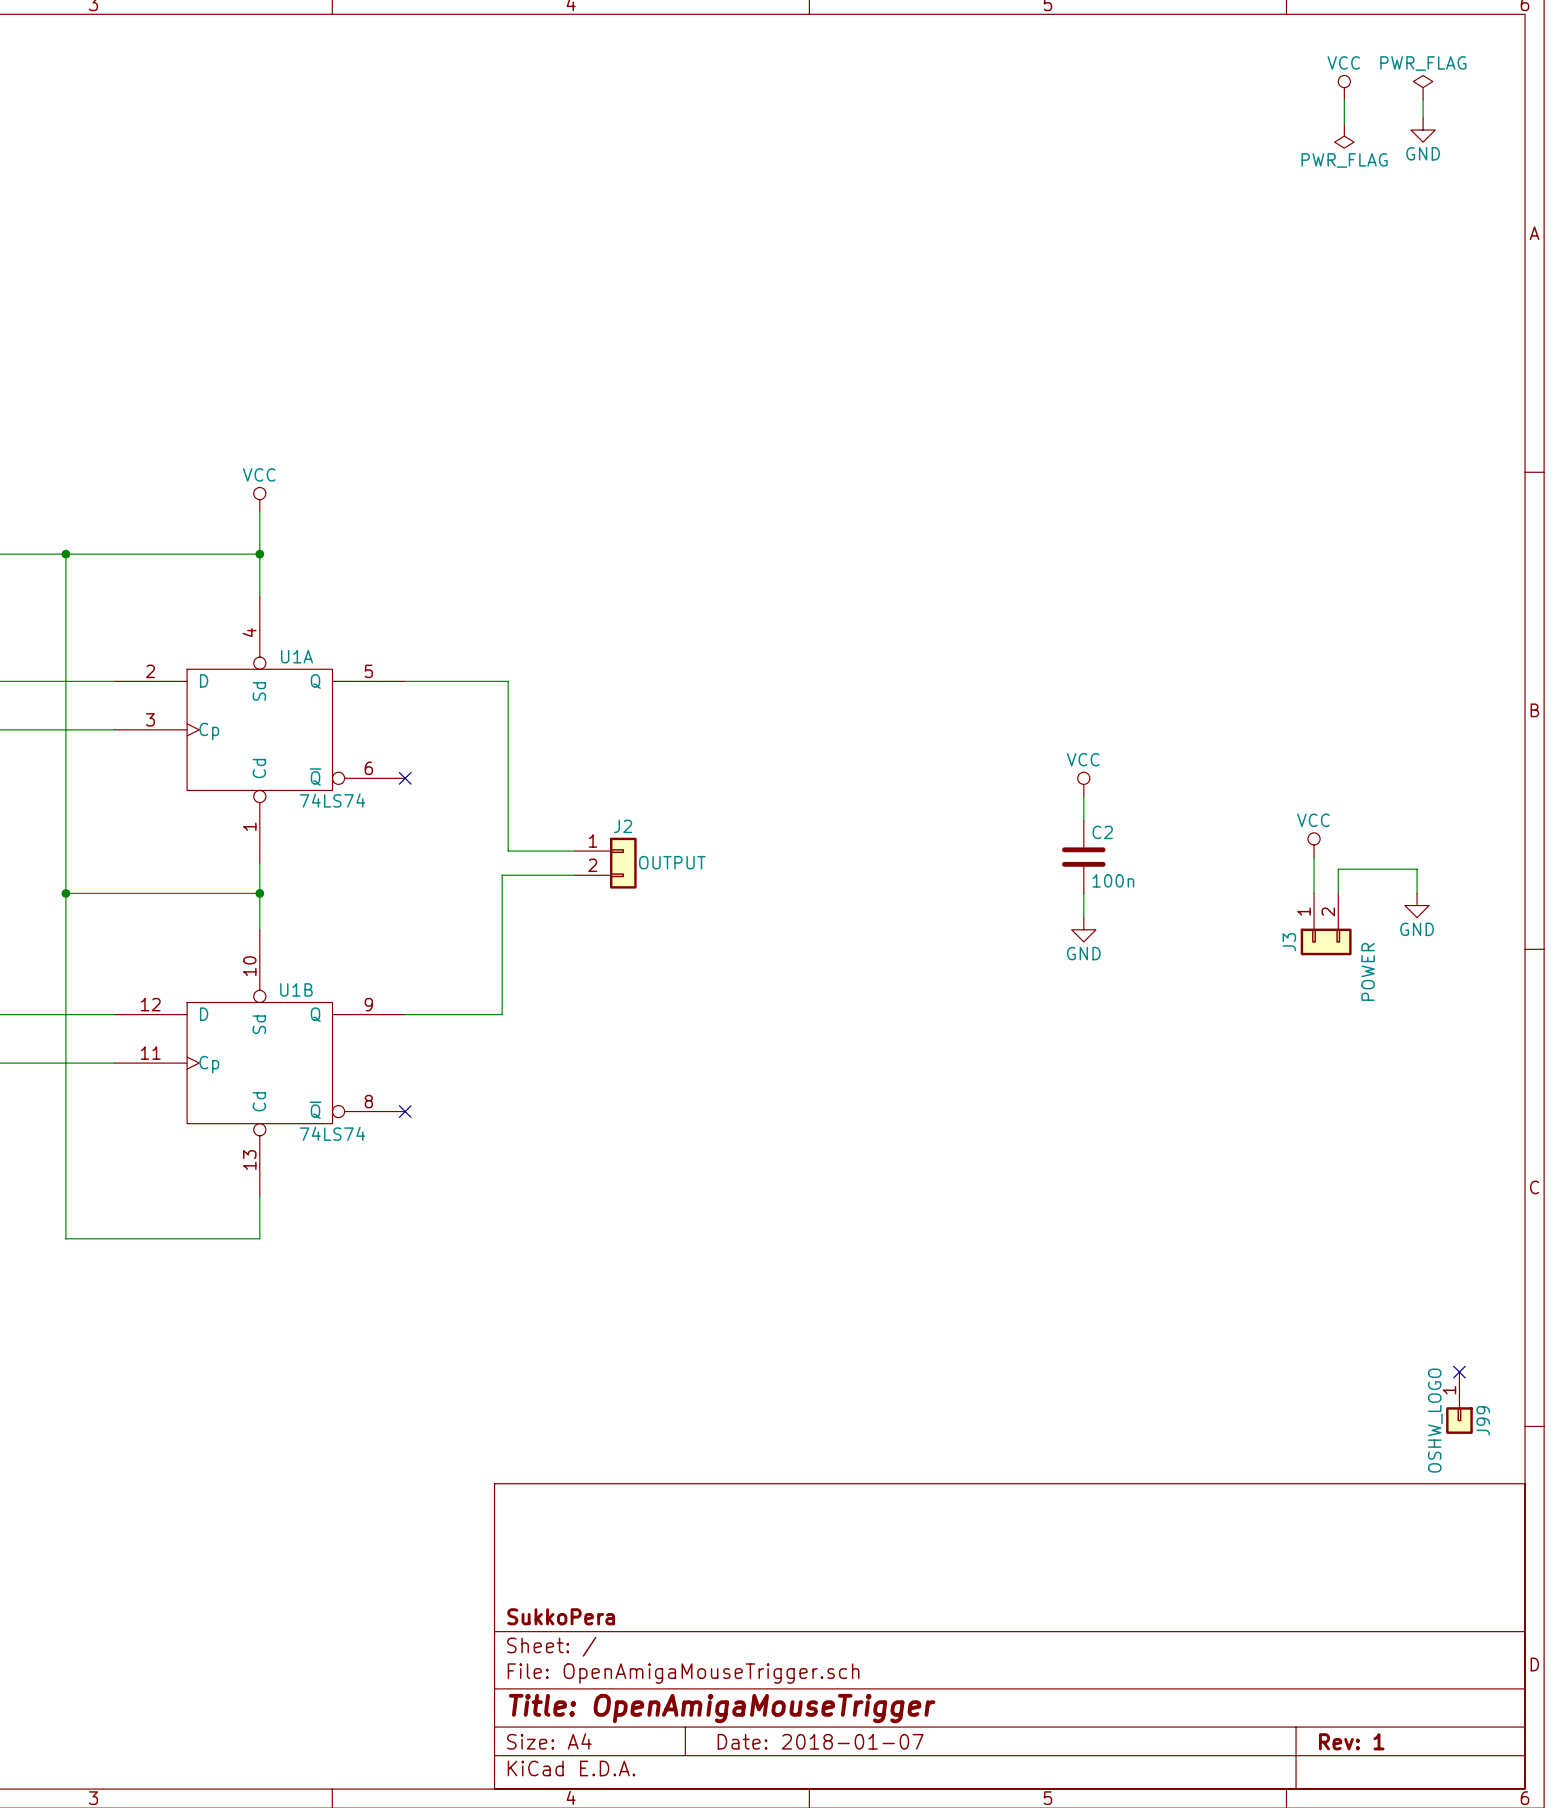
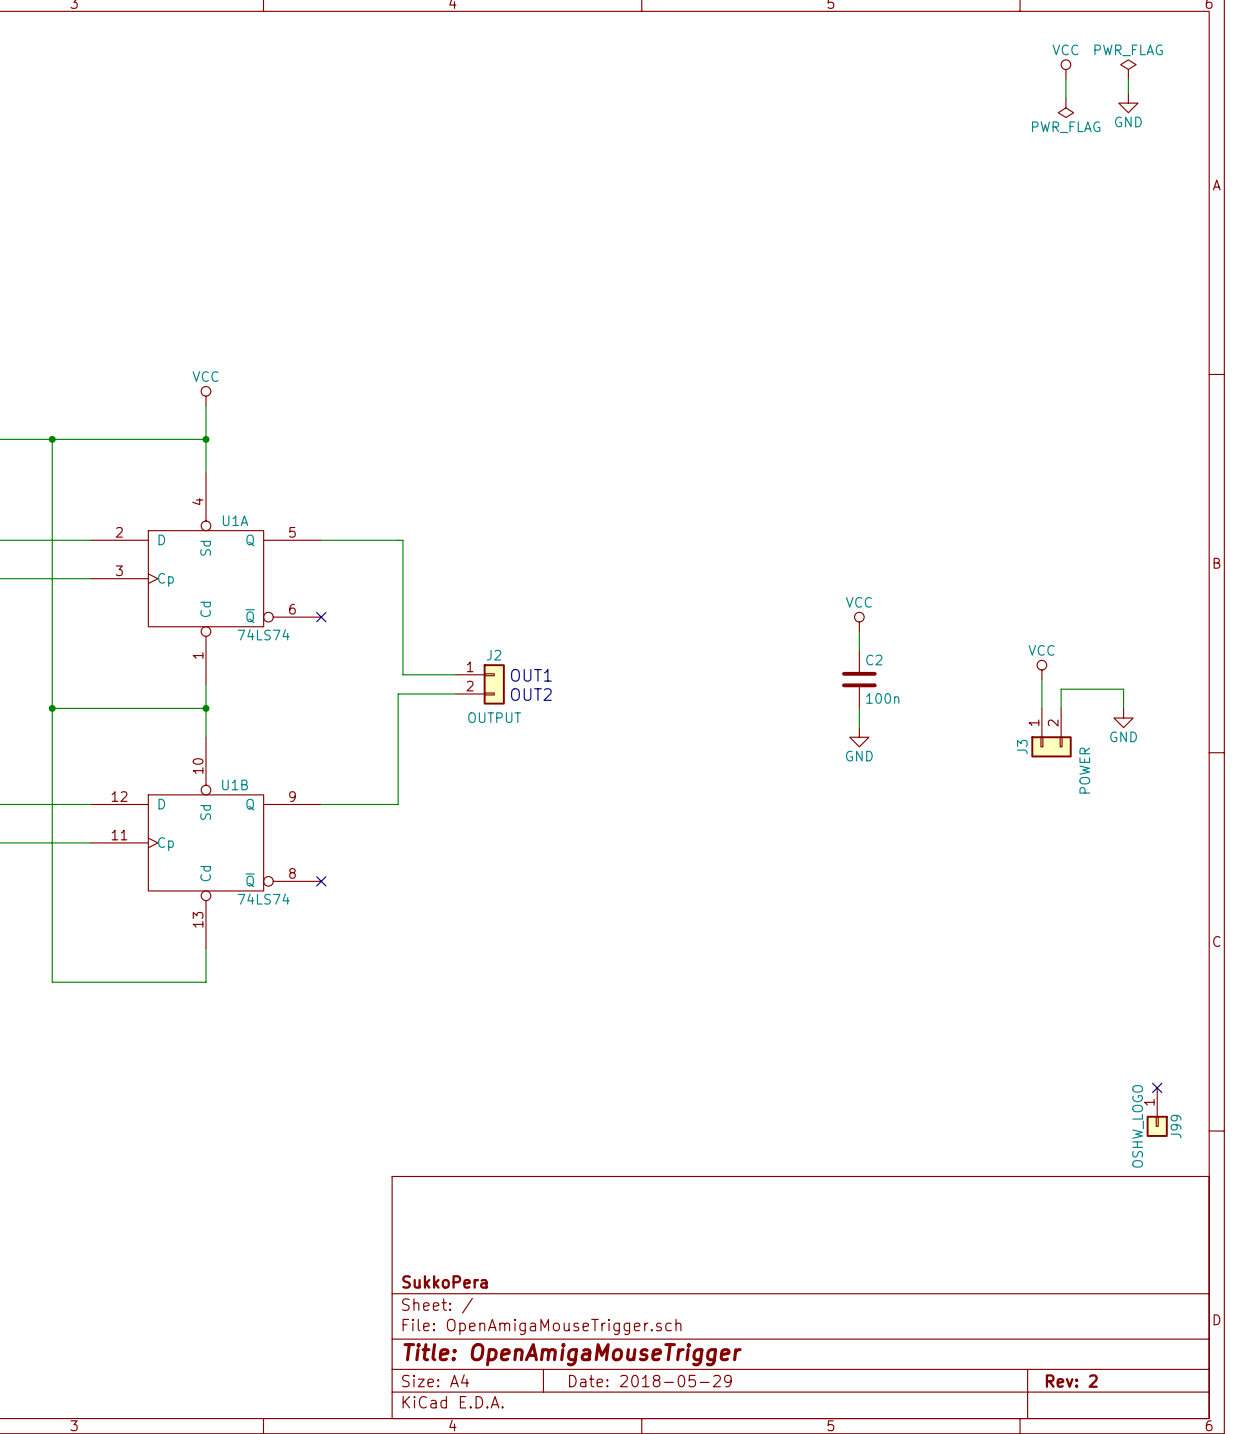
text: none -> OUT1 (531, 675)
J2 value position: OUTPUT (672, 862) -> OUTPUT (494, 717)
text: none -> OUT2 (531, 694)
title block: Date: 2018-01-07 (820, 1741) -> Date: 2018-05-29 (650, 1381)
title block: Rev: 1 (1351, 1741) -> Rev: 2 (1071, 1381)

